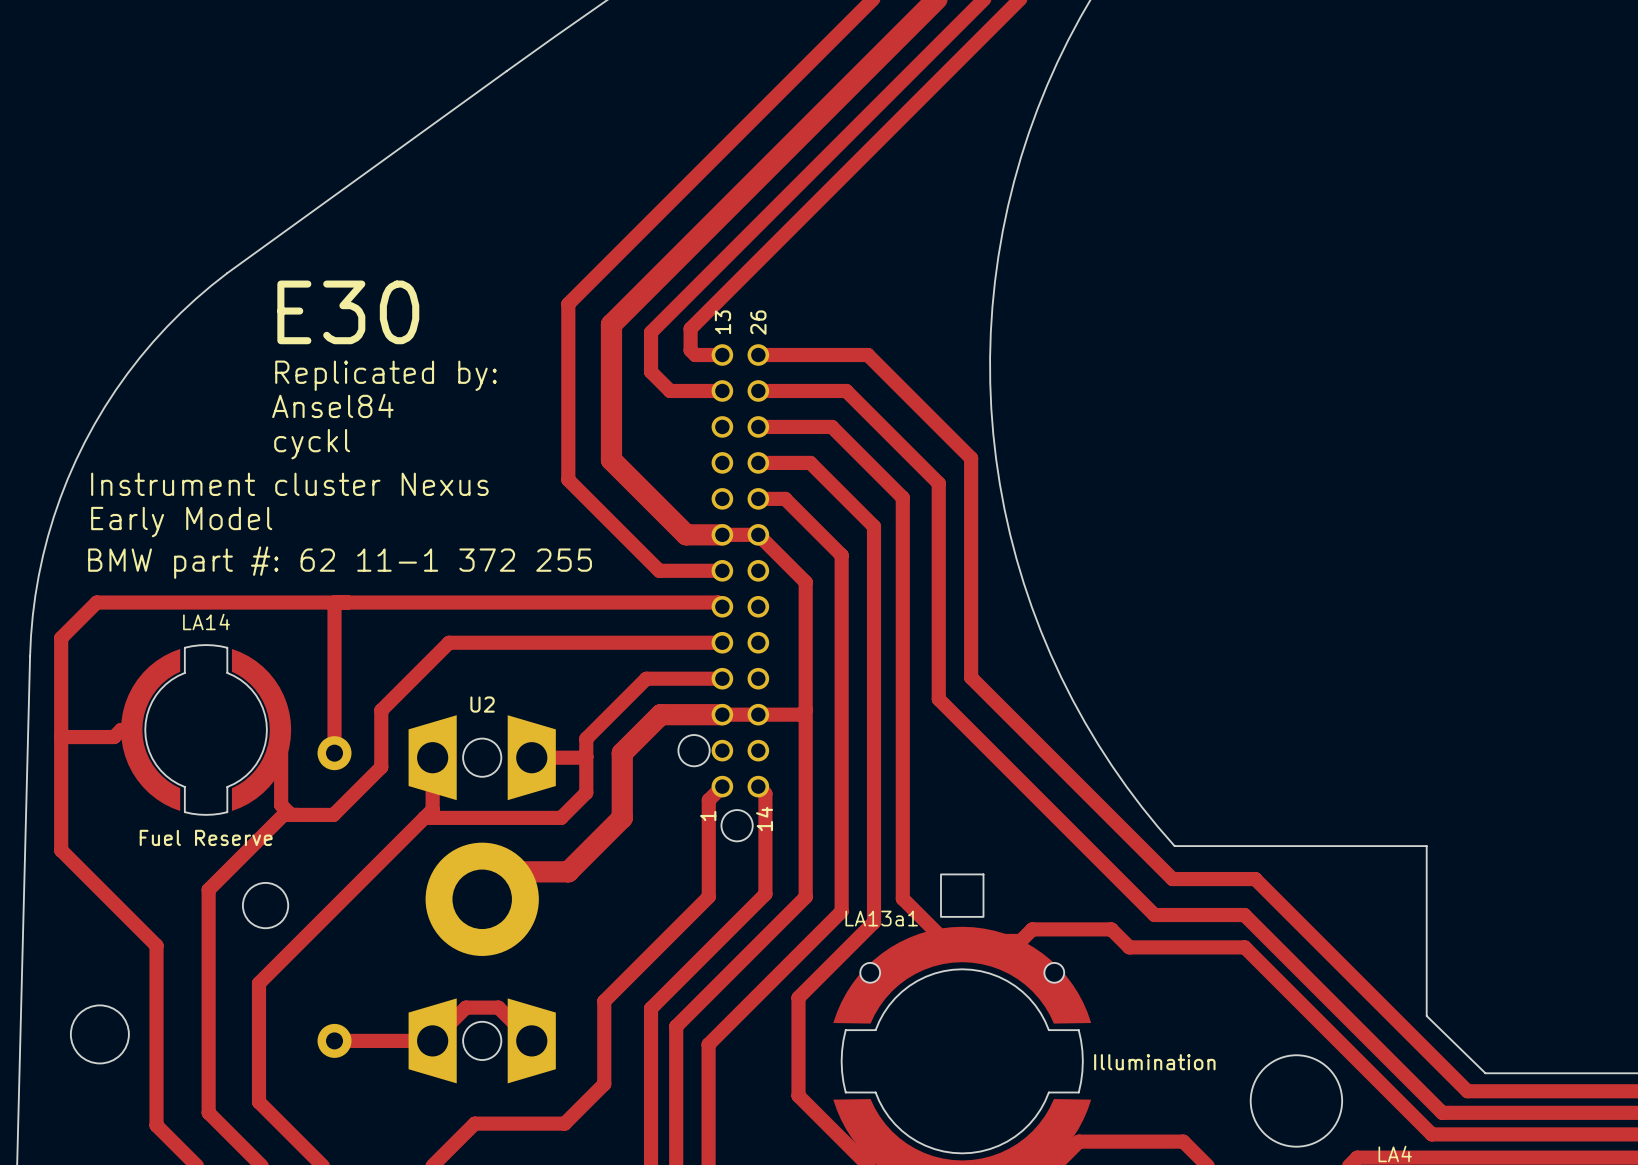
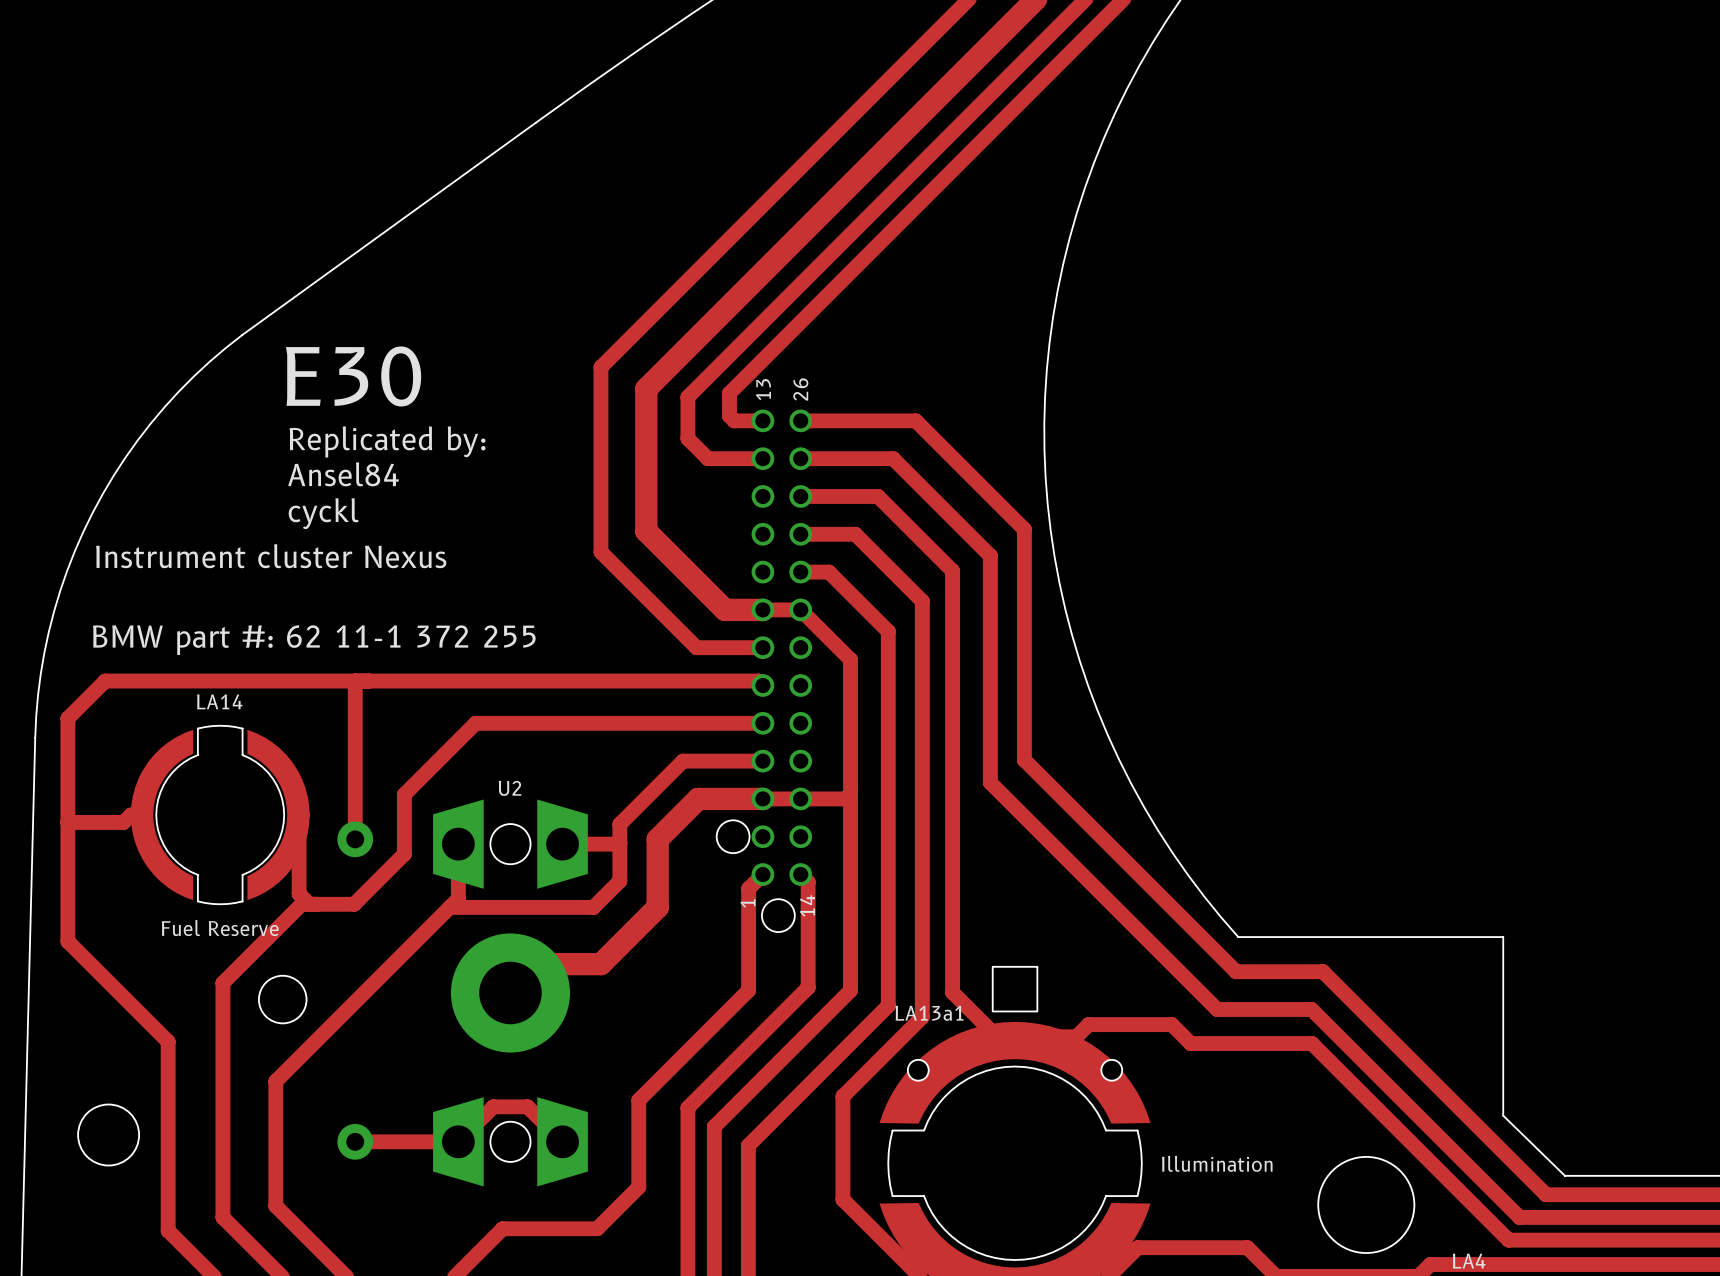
text: Early Model (181, 522) -> none

